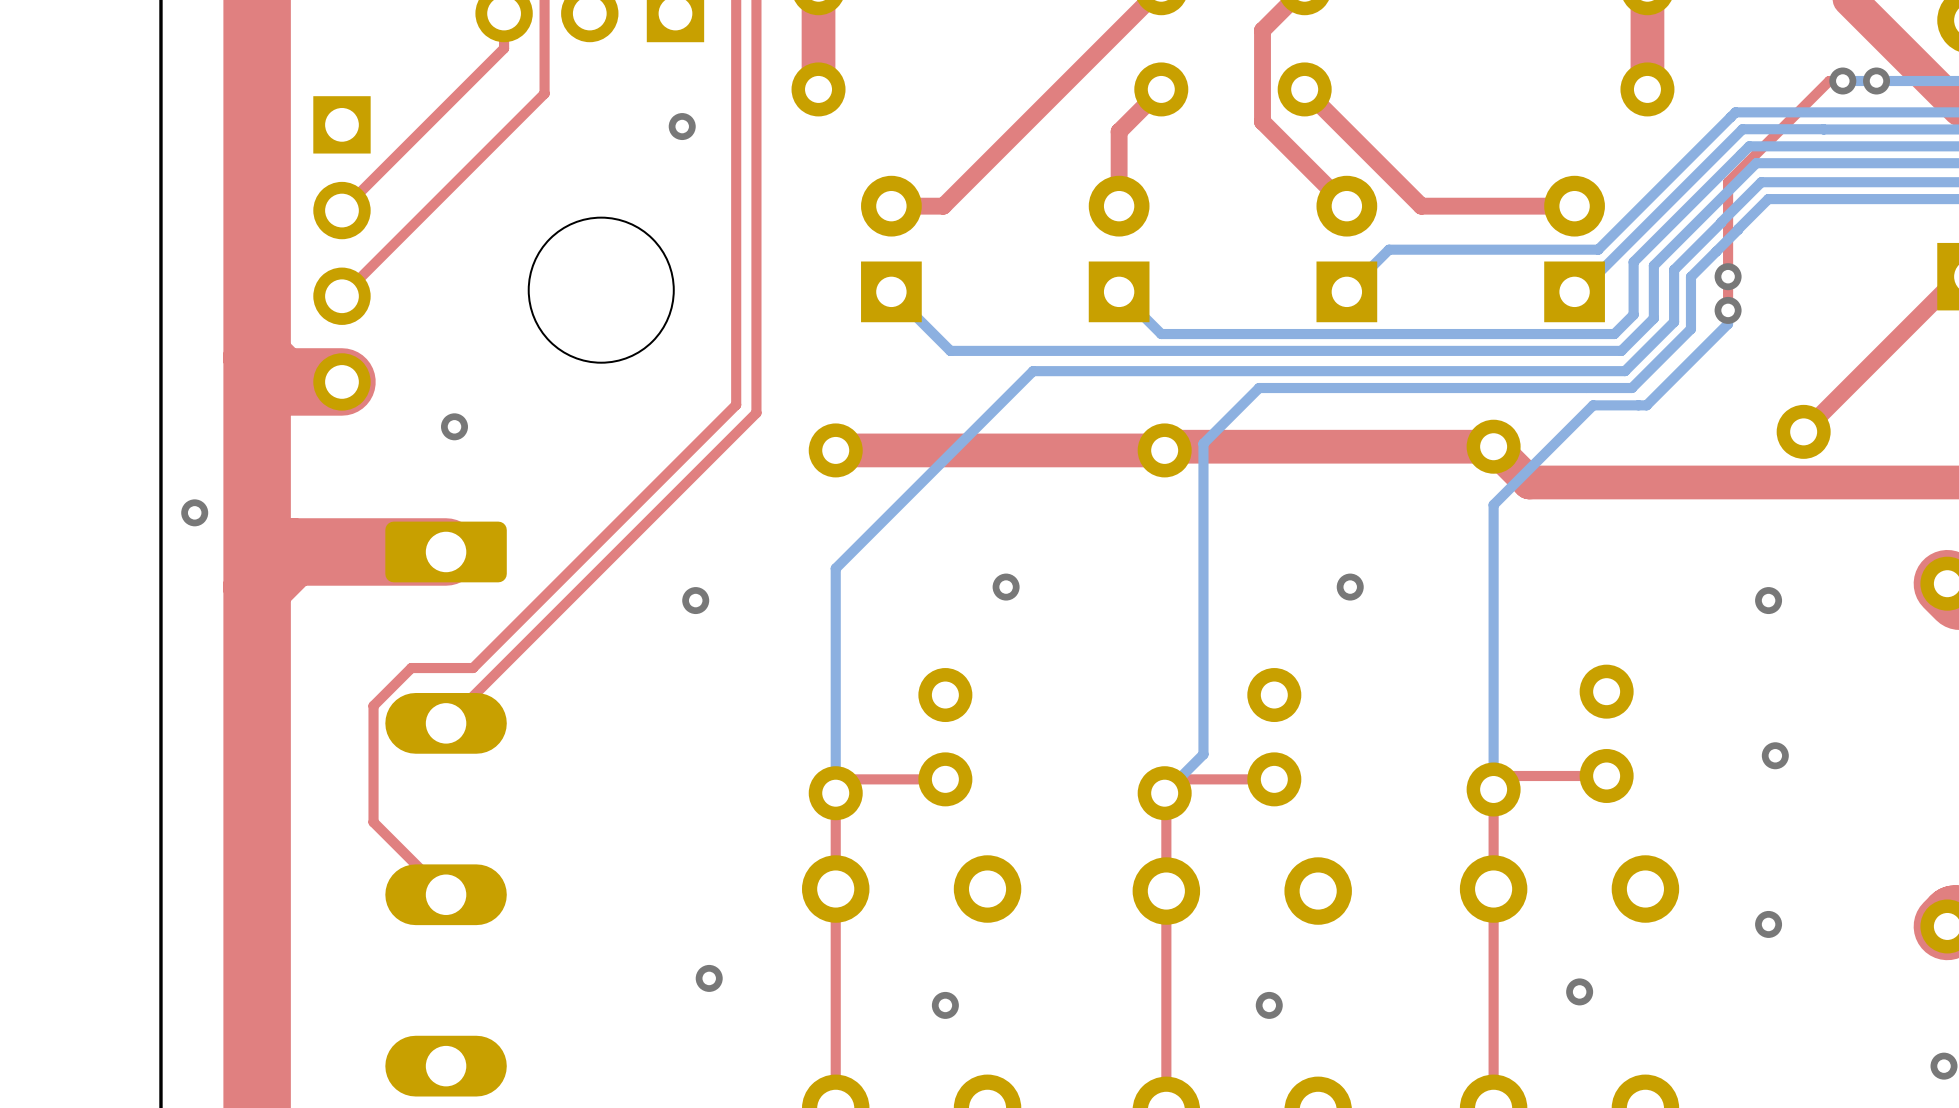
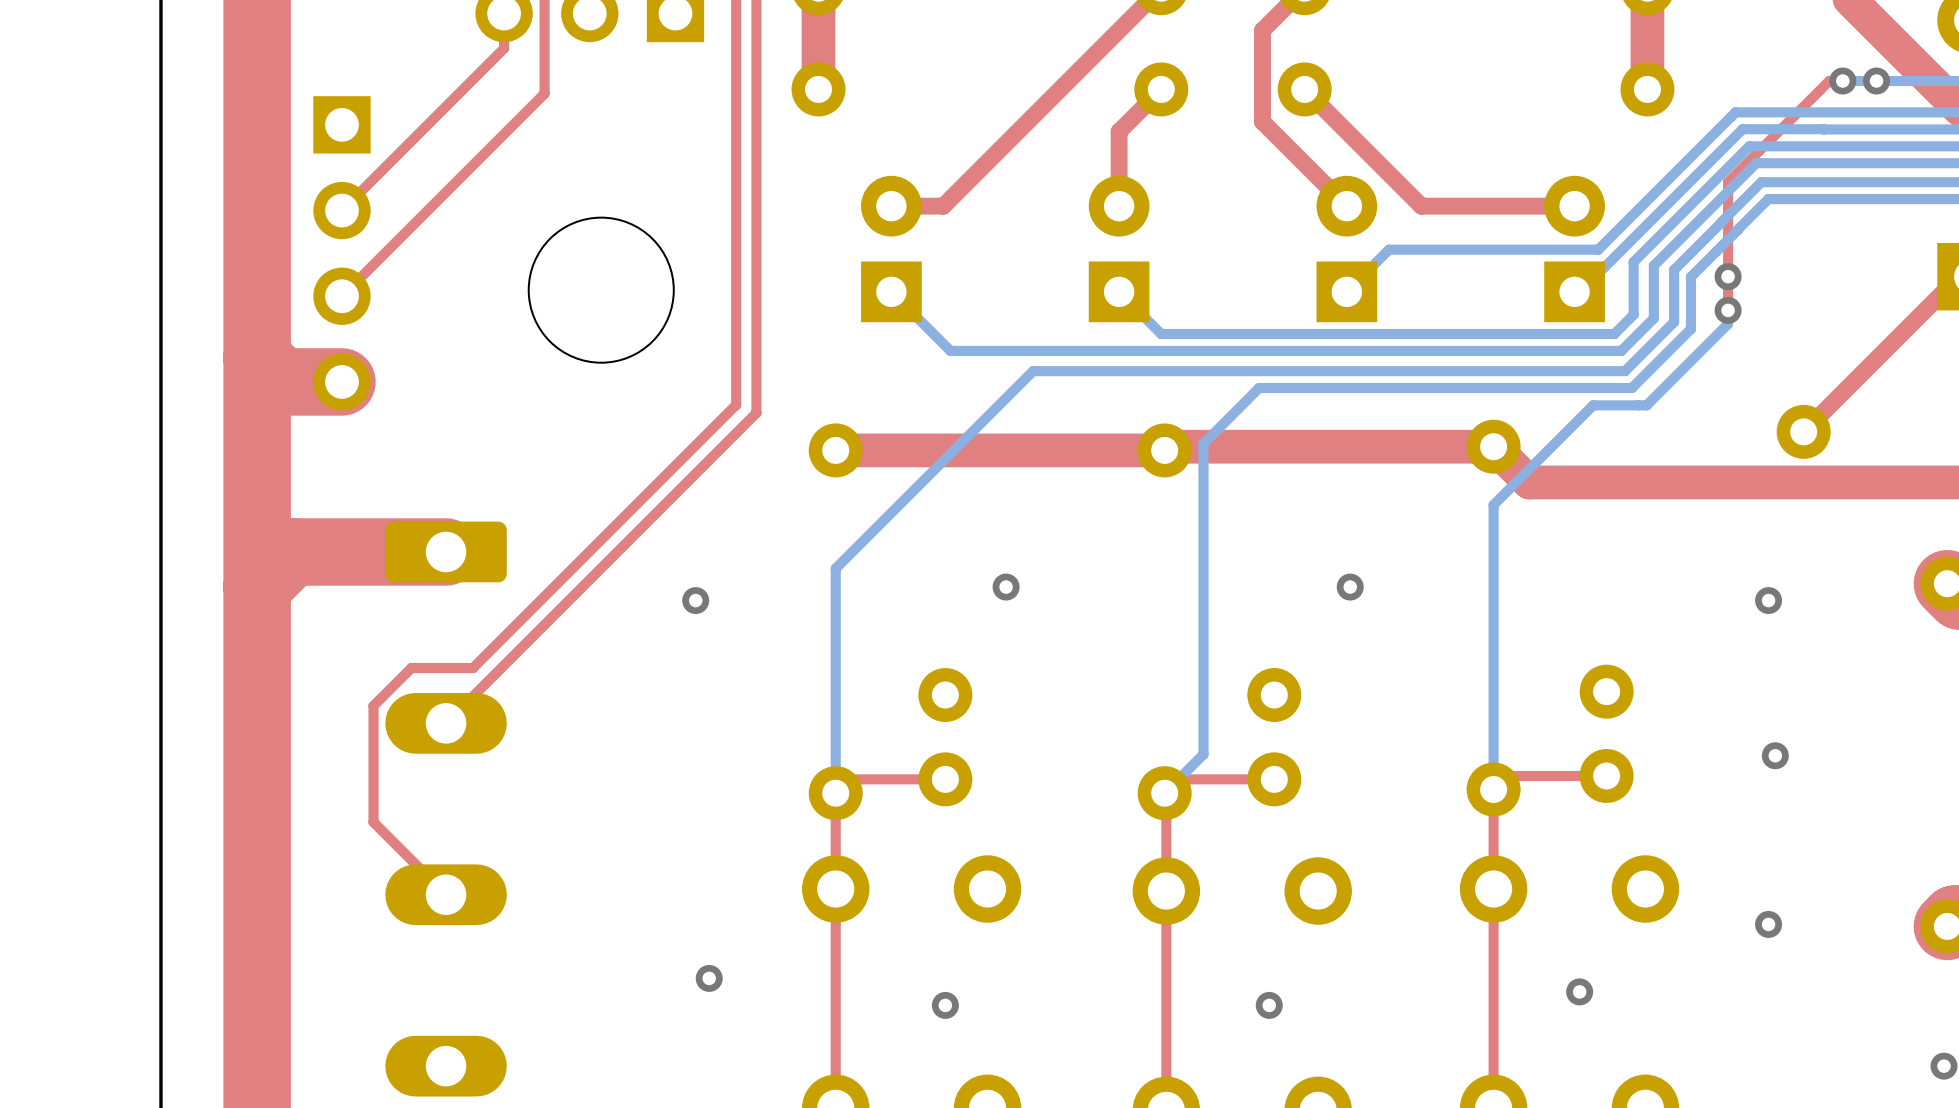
via: (682, 126) -> none
via: (454, 426) -> none
via: (194, 512) -> none

